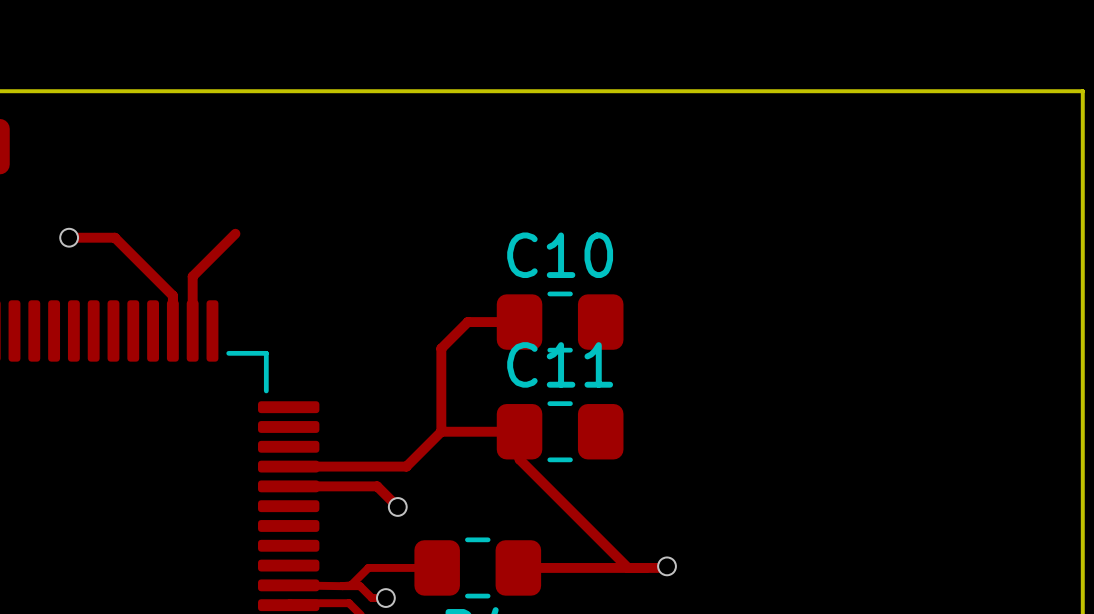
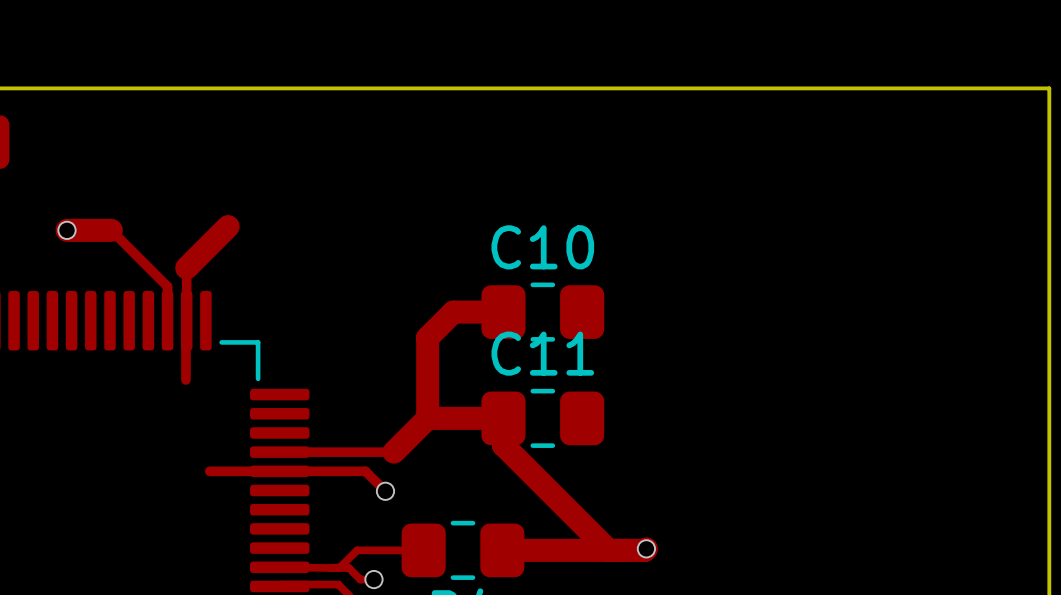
track width: thin (235, 233) (192, 276) -> thick (228, 226) (186, 267)
track width: thin (69, 237) (114, 237) -> thick (67, 230) (111, 230)
track width: thin (519, 322) (467, 322) (441, 348) (441, 431) -> thick (503, 312) (453, 312) (427, 337) (427, 418)
track: none -> (186, 320) (185, 380)
track width: thin (441, 431) (519, 431) (519, 459) (628, 567) -> thick (427, 418) (503, 418) (503, 445) (608, 550)
track width: thin (441, 431) (406, 466) -> thick (427, 418) (393, 452)
track: none -> (209, 471) (279, 471)
track width: thin (667, 566) (665, 567) (518, 567) -> thick (646, 548) (644, 550) (502, 550)

